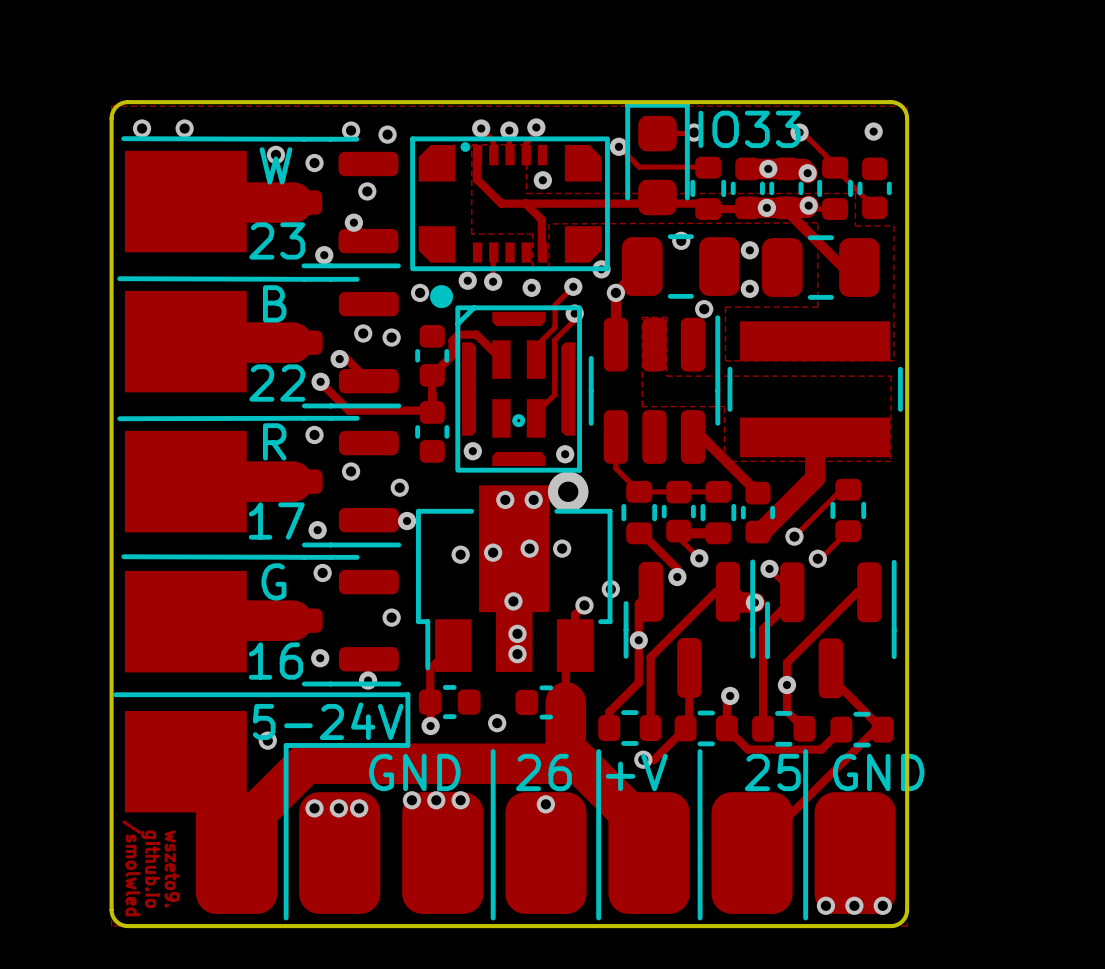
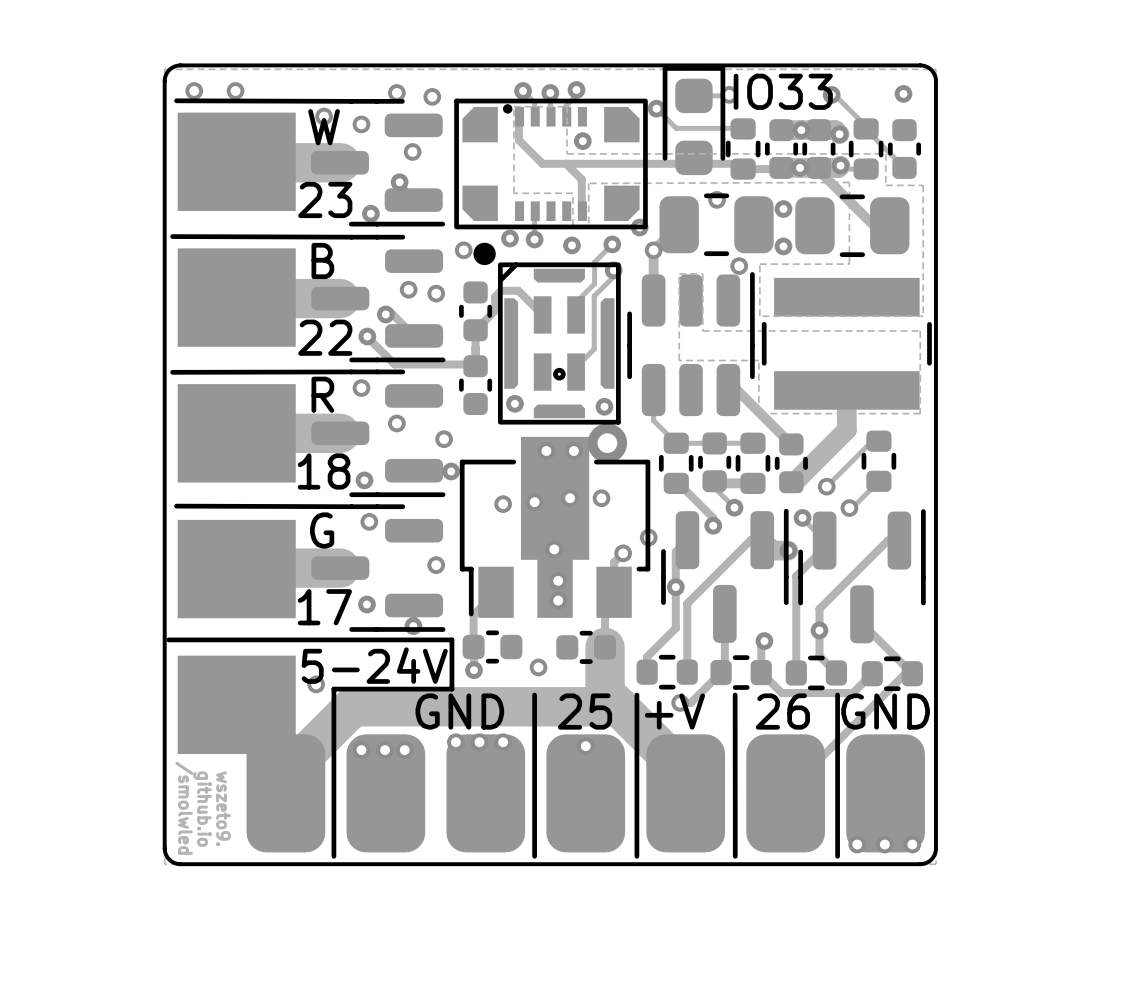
text: 17 (276, 521) -> 18 (324, 471)
text: 16 (275, 661) -> 17 (324, 607)
text: GND 26 +V 25 GND (646, 772) -> GND 25 +V 26 GND (672, 711)

